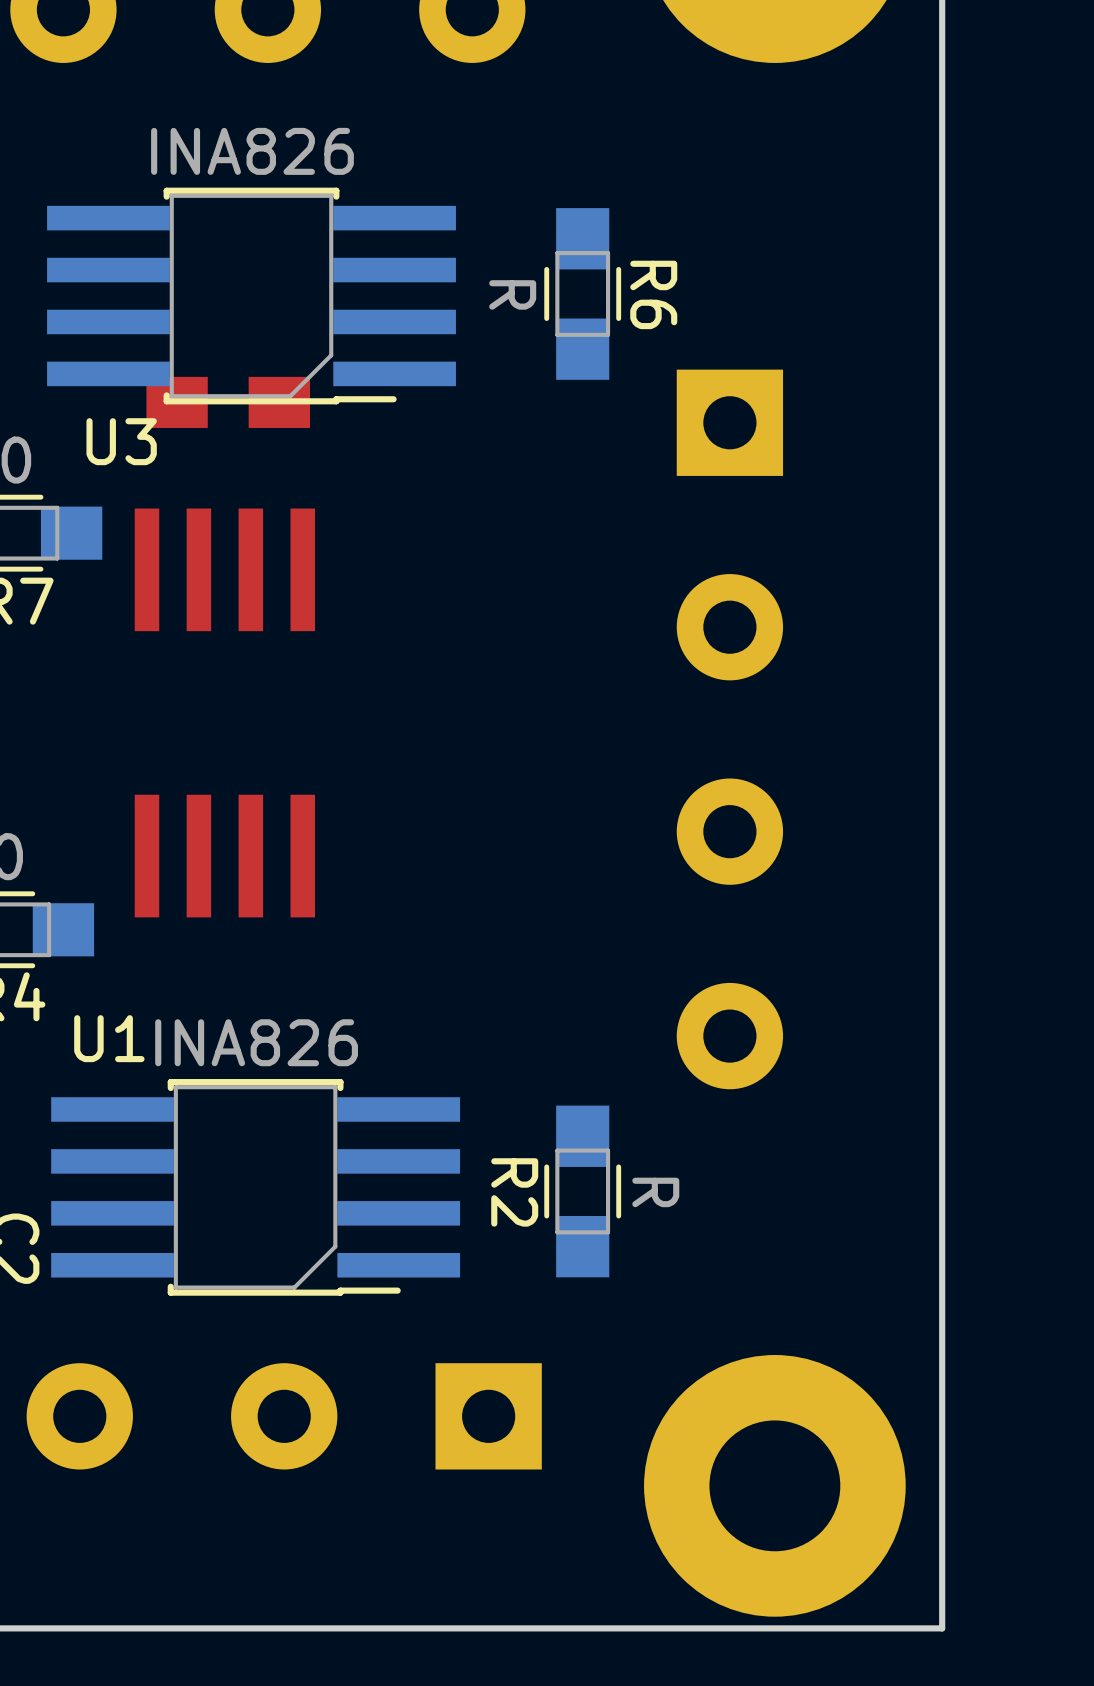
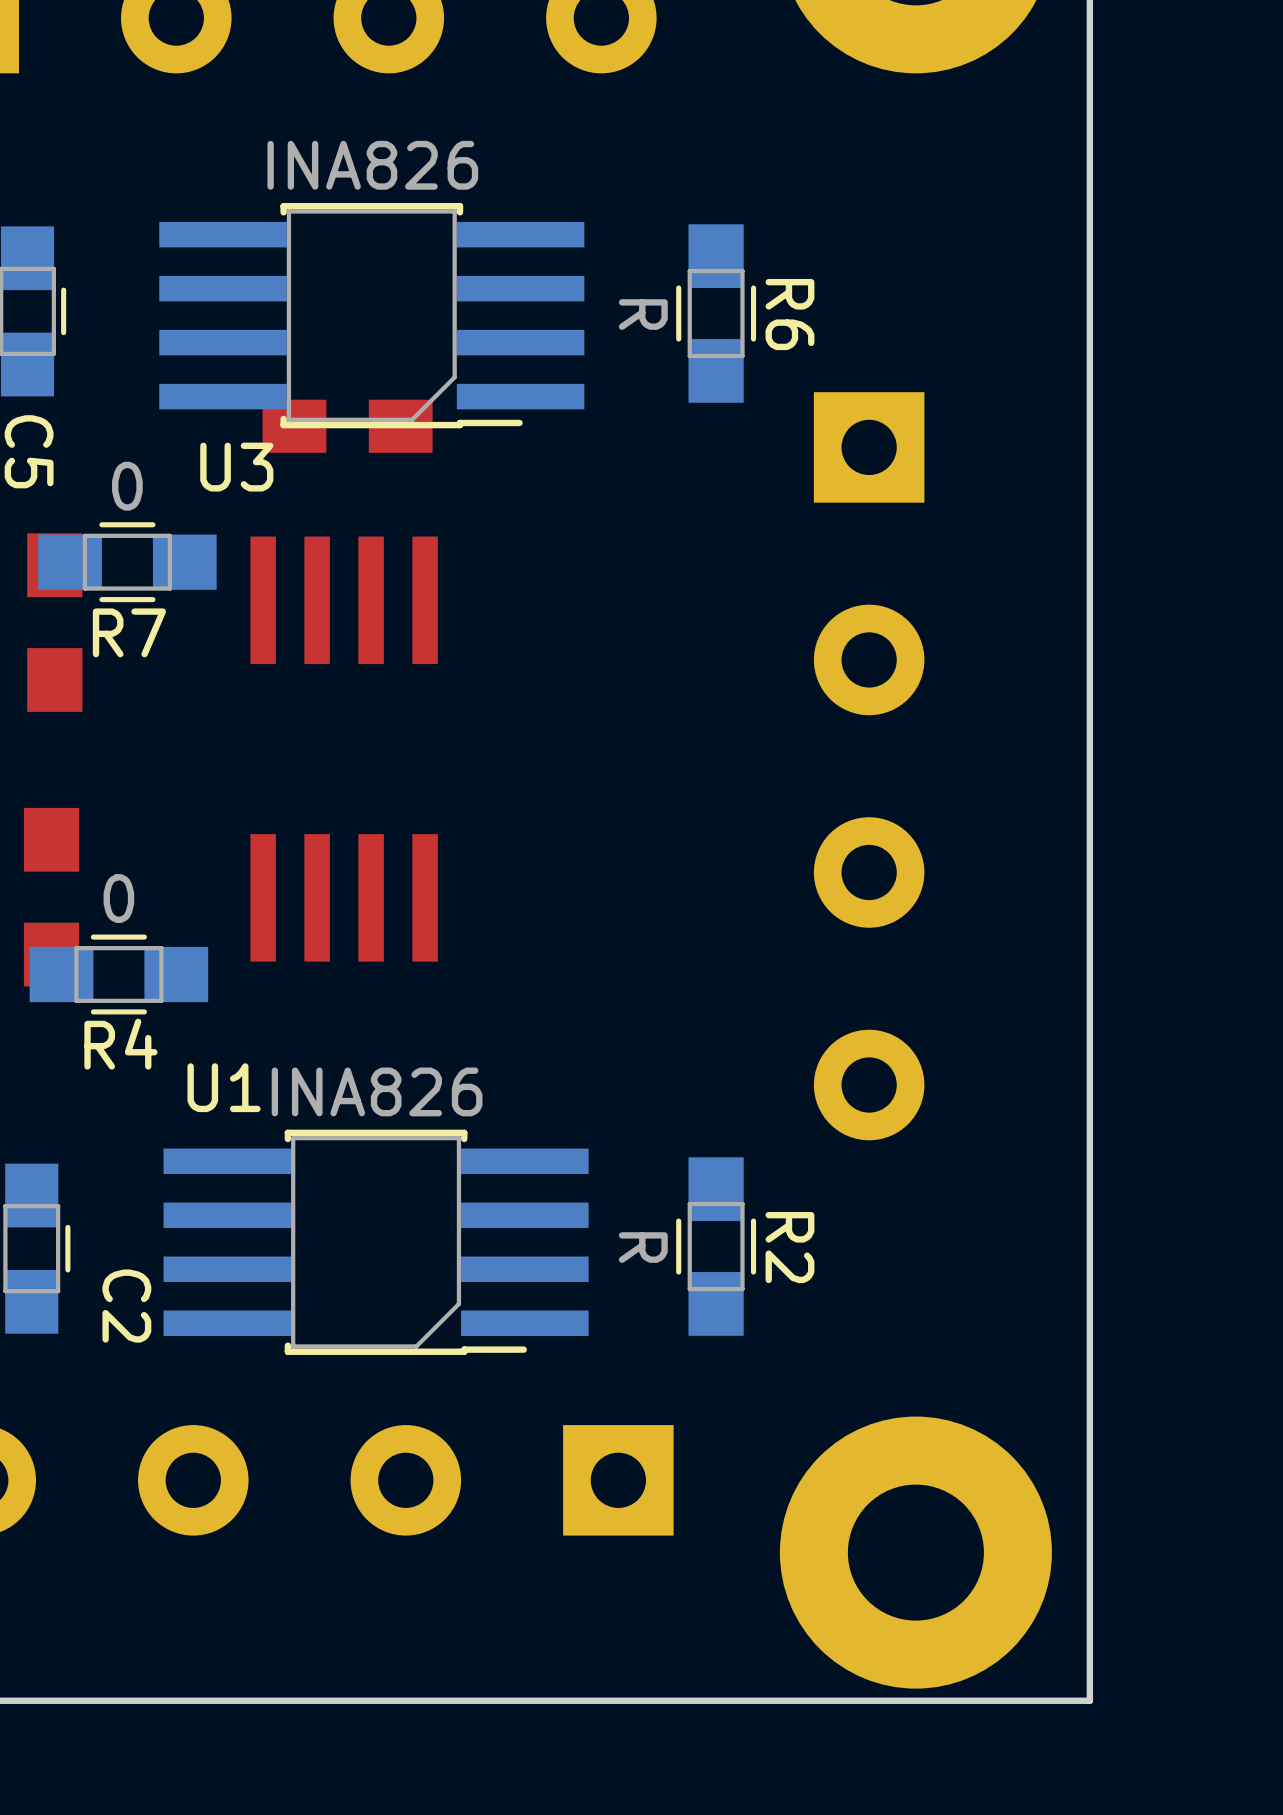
R2 name position: R2 (514, 1192) -> R2 (789, 1247)
R2 value position: R (655, 1192) -> R (643, 1247)

